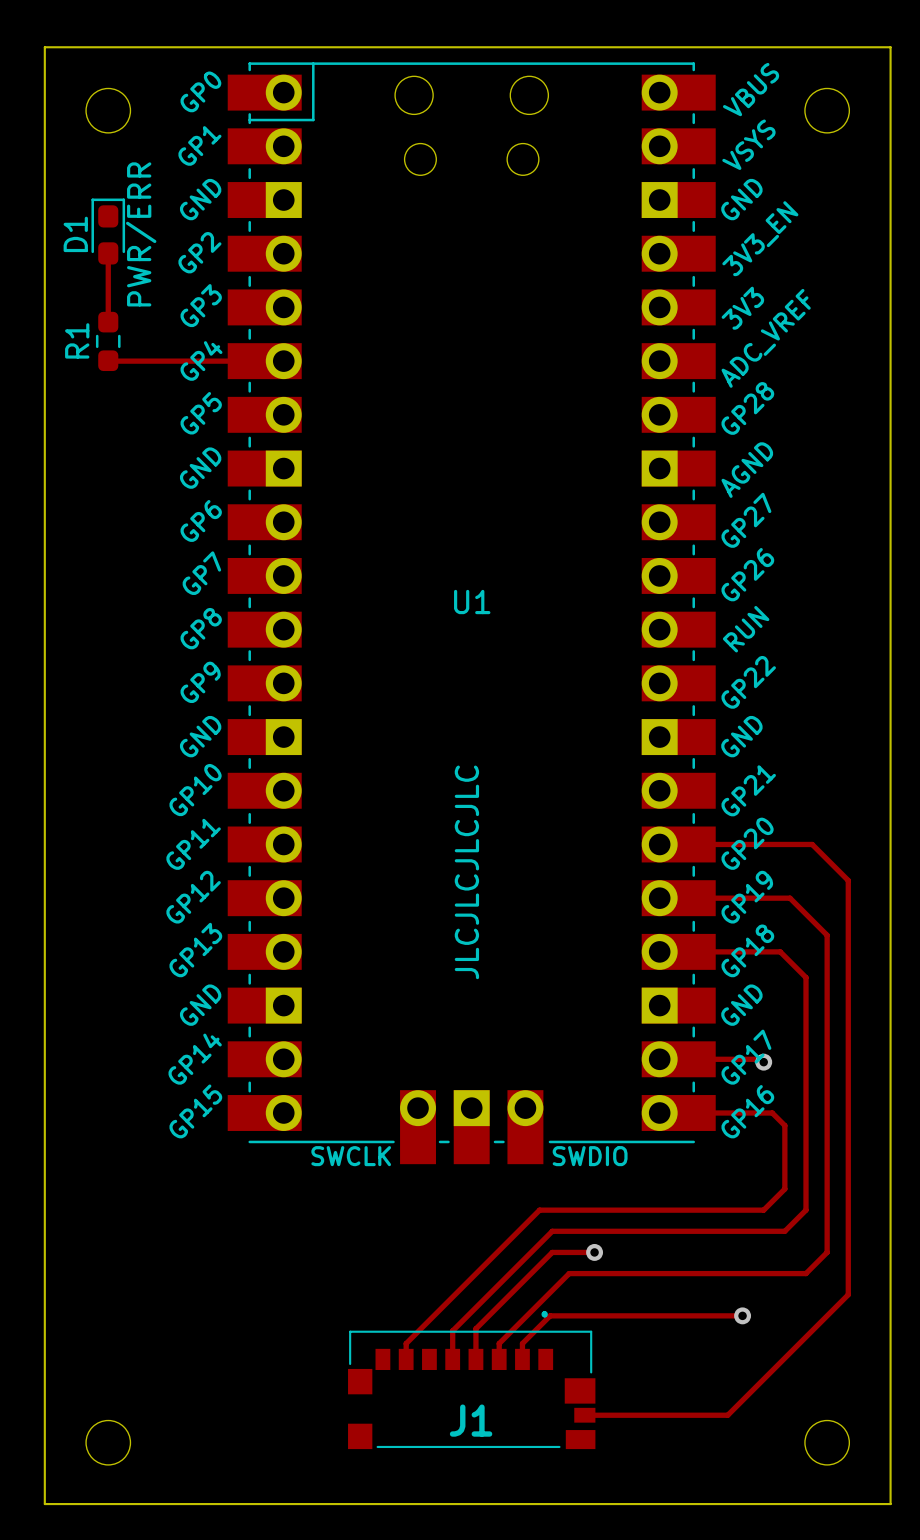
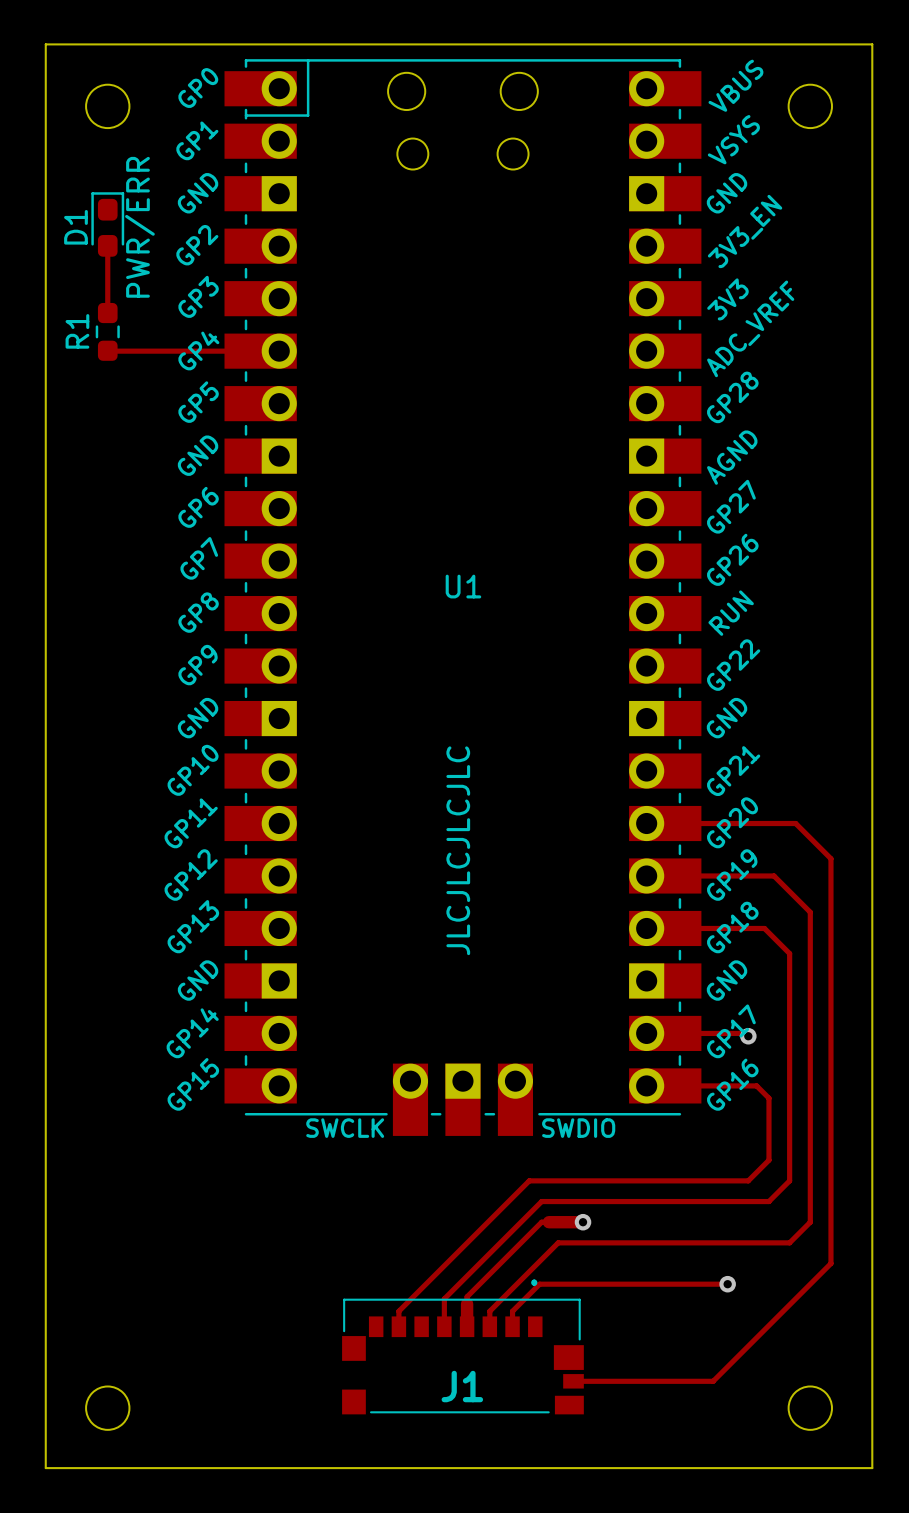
track width: thin (559, 1252) (594, 1252) -> thick (548, 1222) (583, 1222)
track width: thin (475, 1336) (475, 1359) -> thick (467, 1304) (467, 1326)

